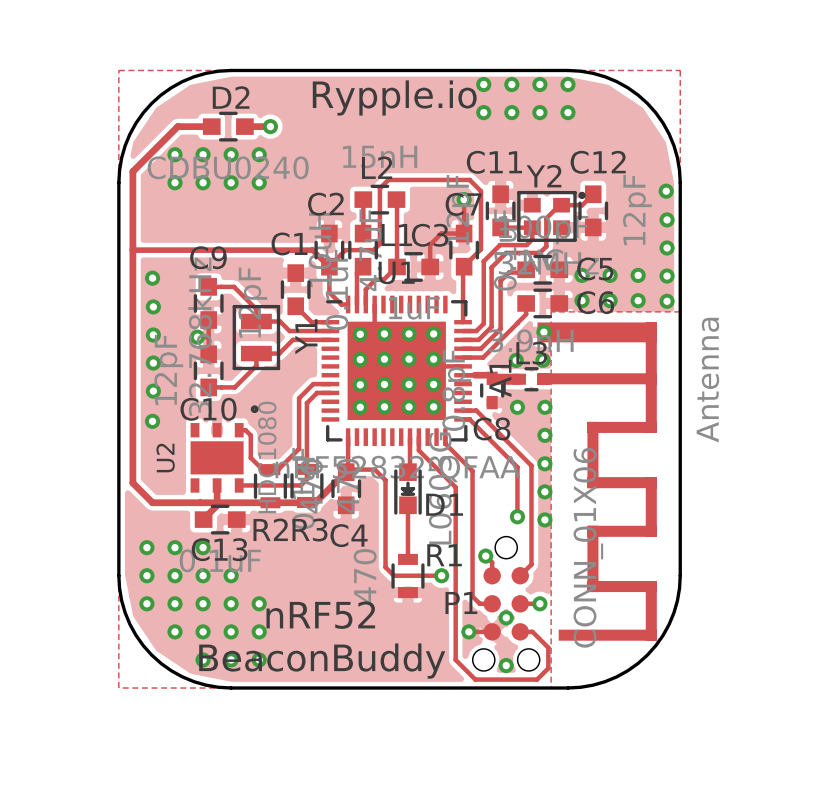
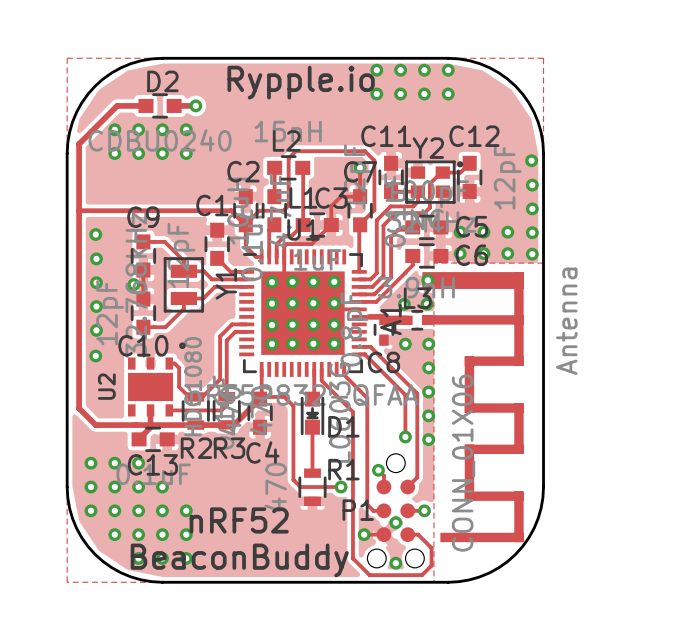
track: none -> (330, 225) (311, 244) (286, 244) (284, 246) (284, 256)

